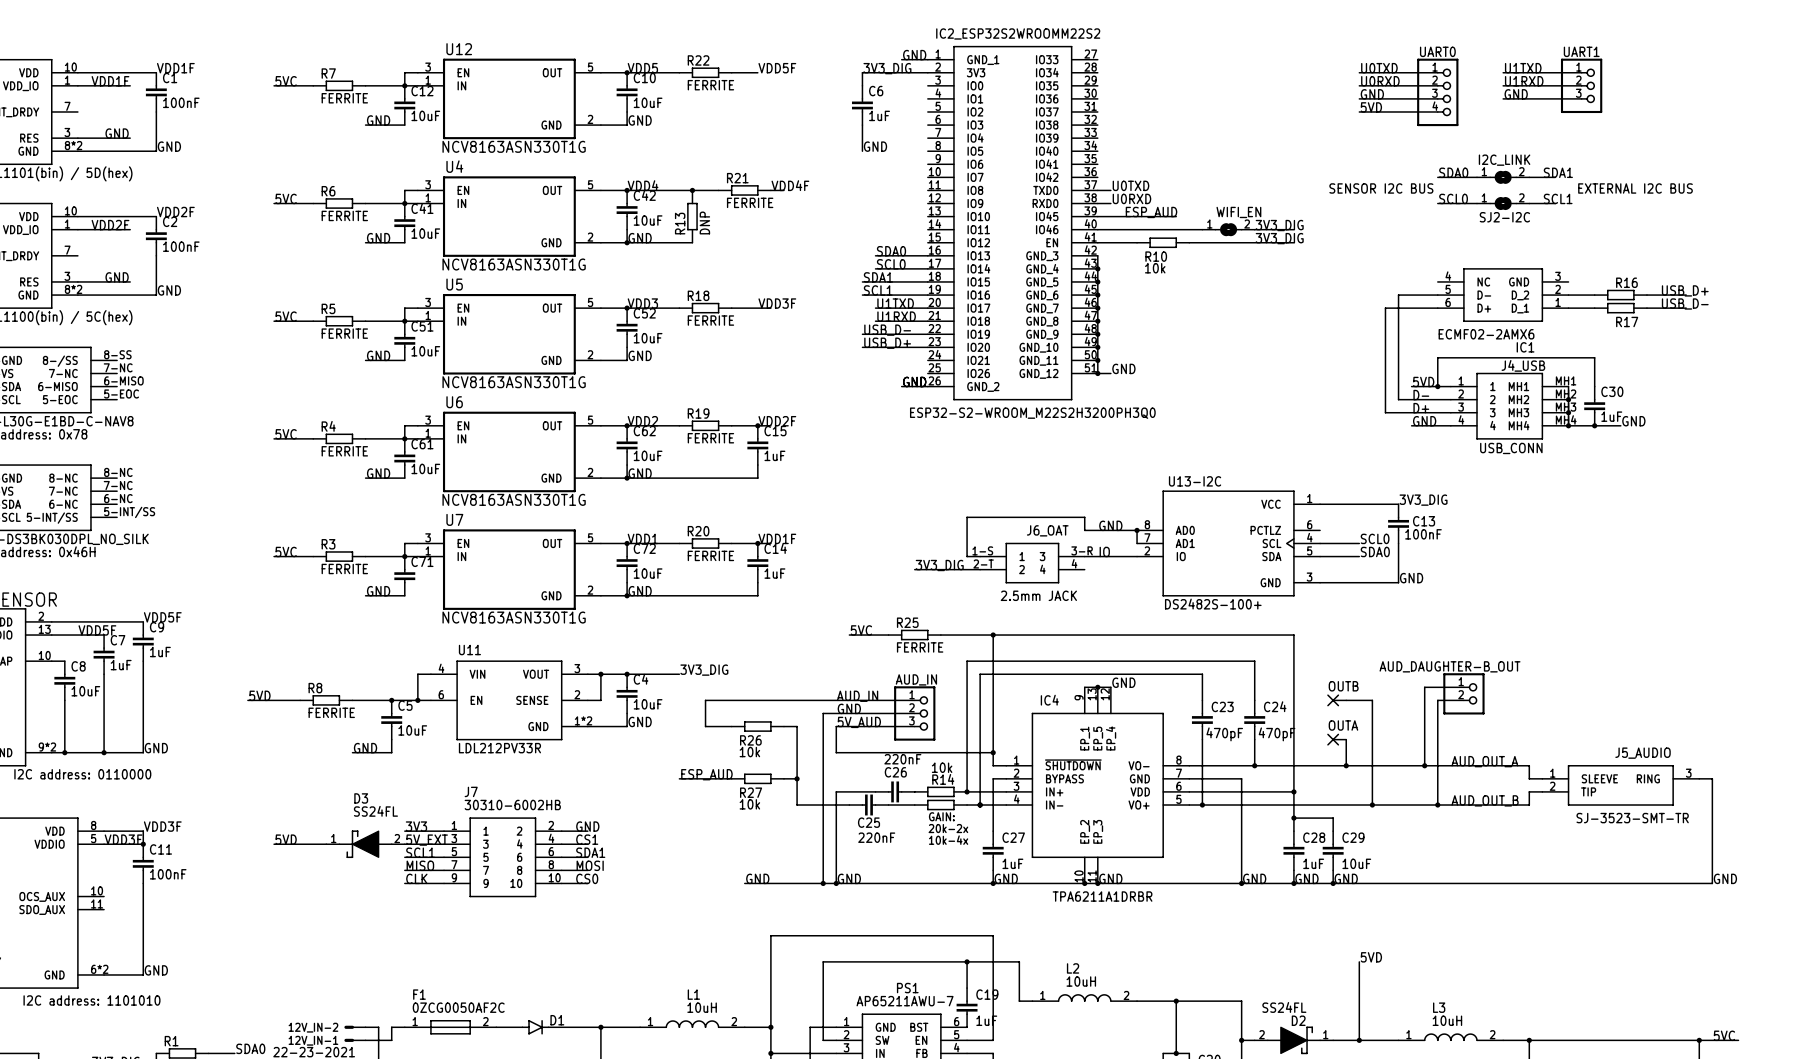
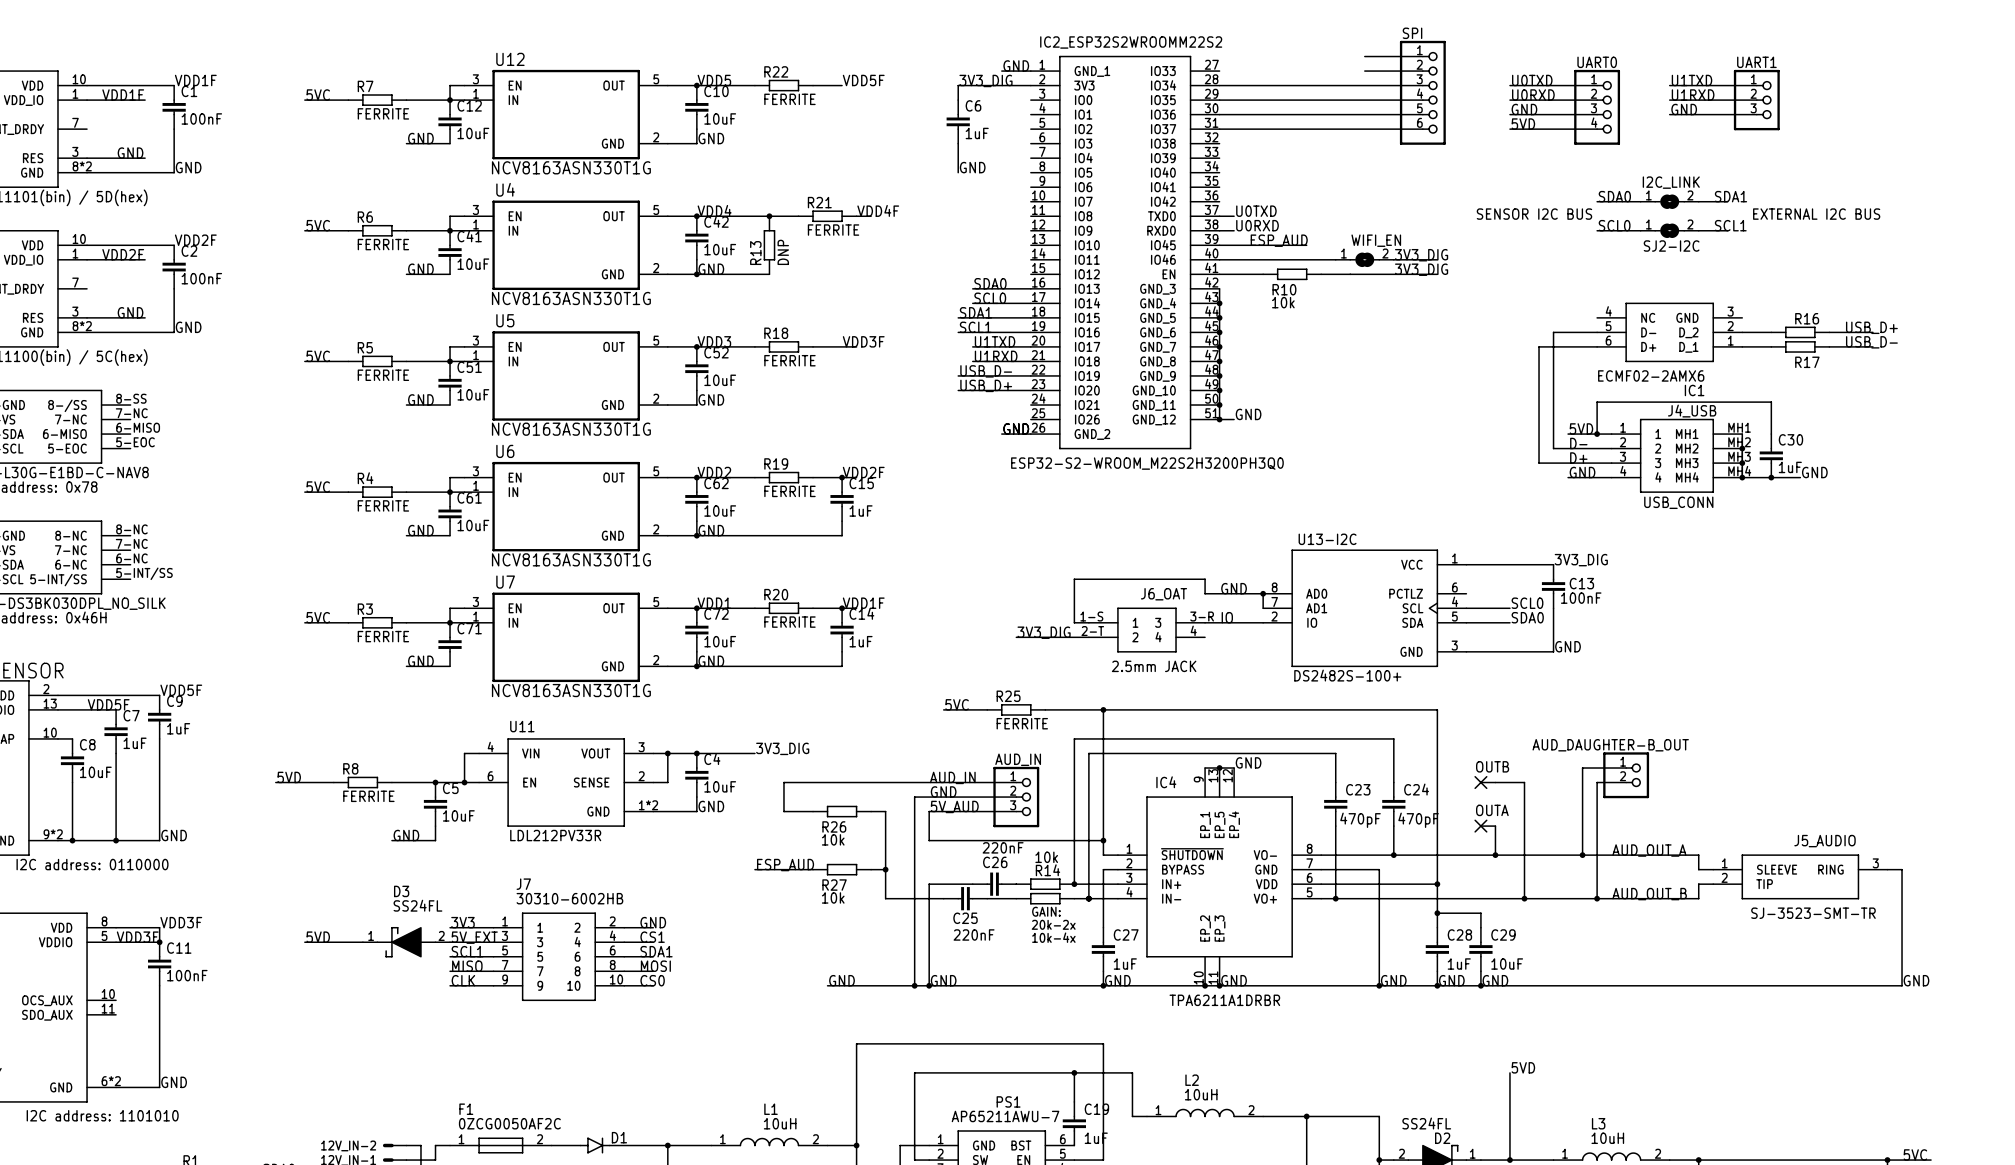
wire: none -> (1364, 56) (1422, 56)
wire: none -> (1364, 71) (1422, 71)
wire: none -> (1219, 85) (1422, 85)
SPI: none -> (1422, 92)
wire: none -> (1219, 100) (1422, 100)
wire: none -> (1219, 114) (1422, 114)
wire: none -> (1219, 129) (1422, 129)

